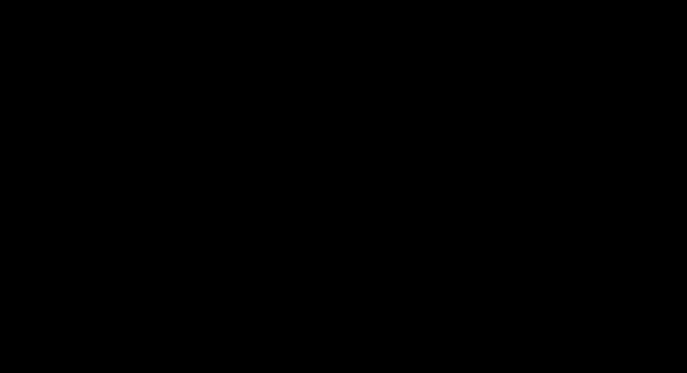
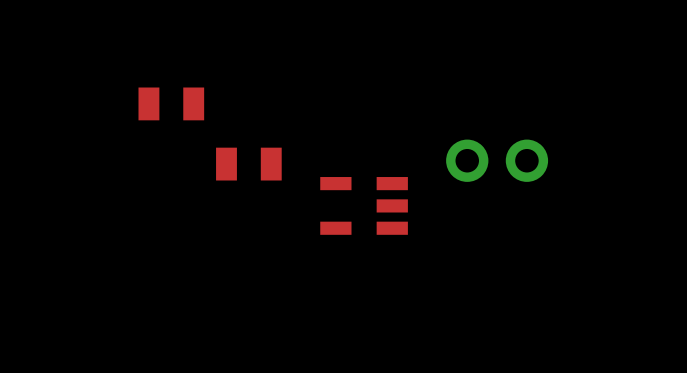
part: none -> (171, 103)
part: none -> (497, 160)
part: none -> (248, 164)
part: none -> (364, 205)

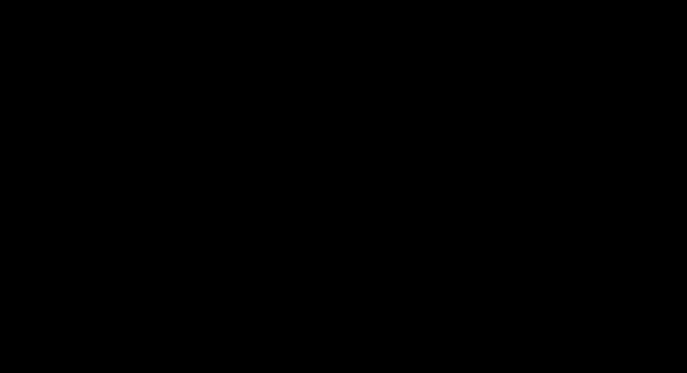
part: (171, 103) -> none
part: (497, 160) -> none
part: (248, 164) -> none
part: (364, 205) -> none

